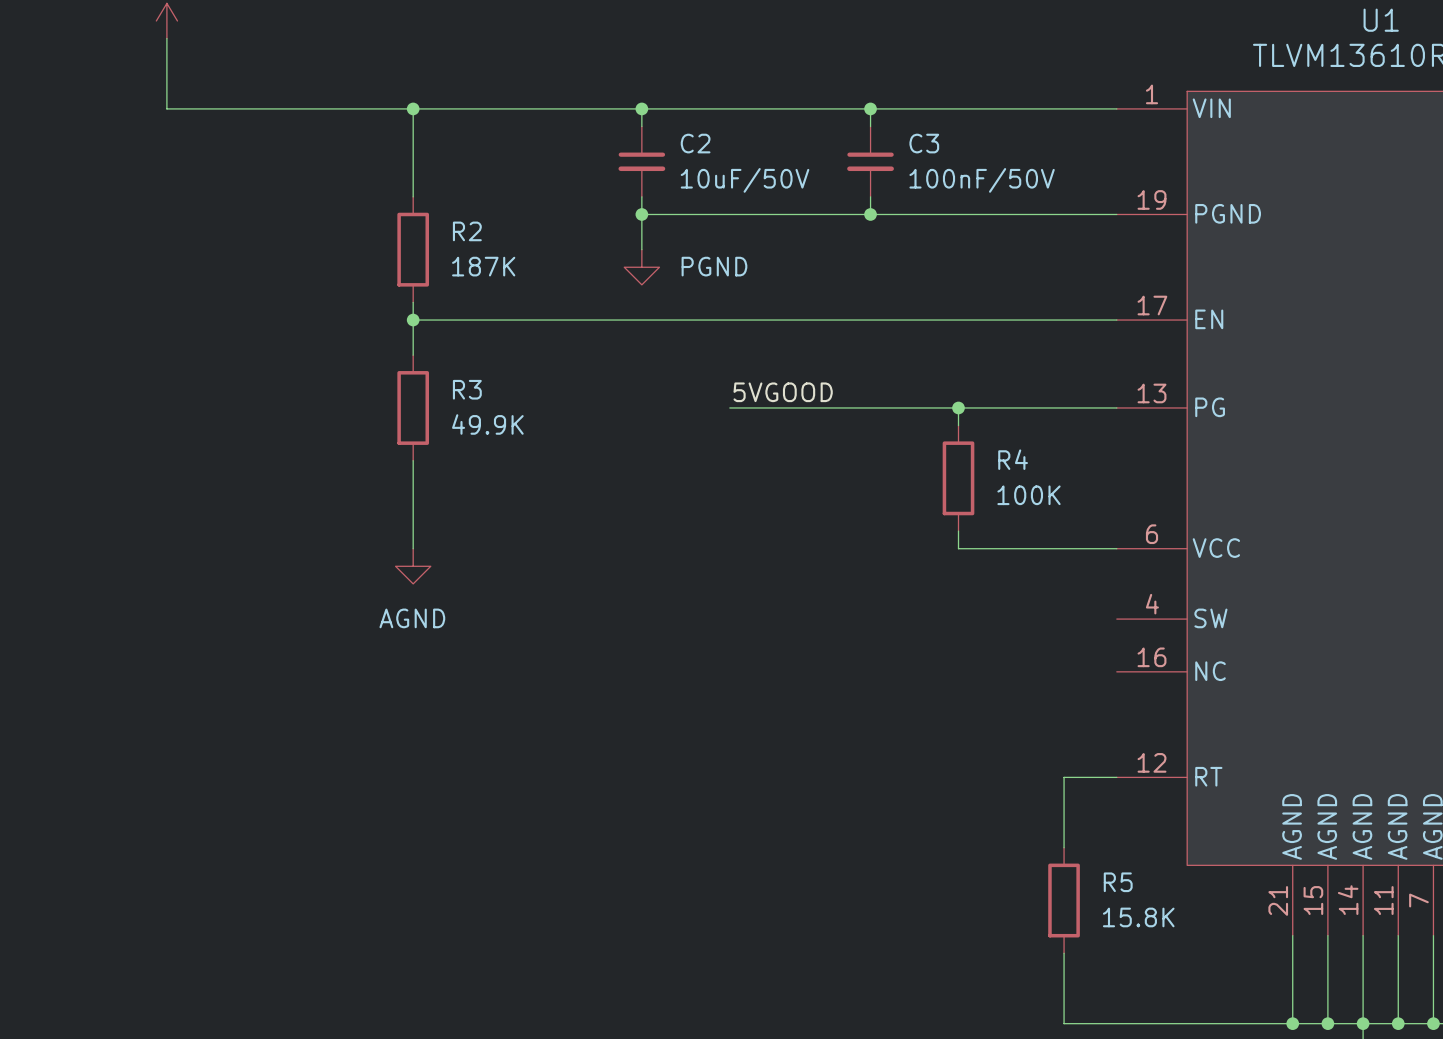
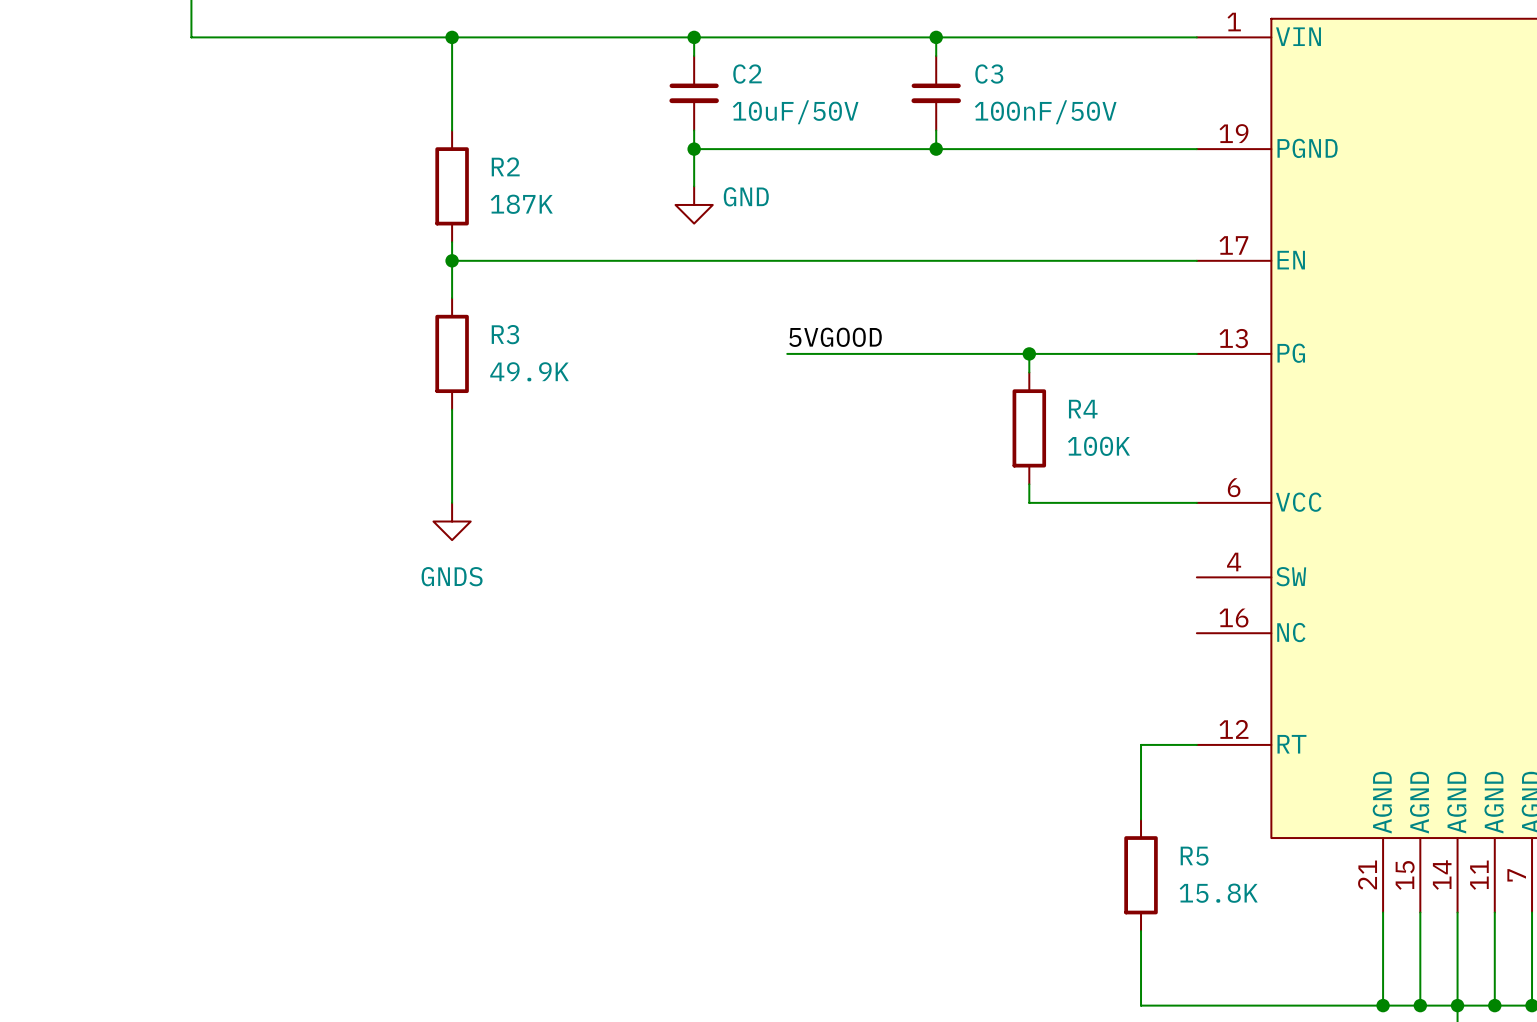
power symbol: PGND (641, 267) -> GND (694, 204)
power symbol: AGND (413, 566) -> GNDS (452, 521)

